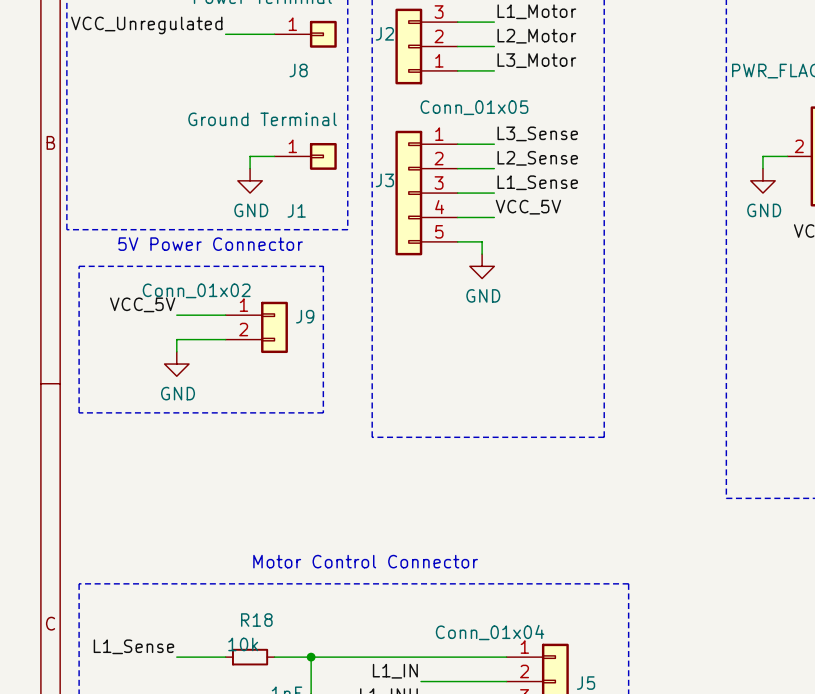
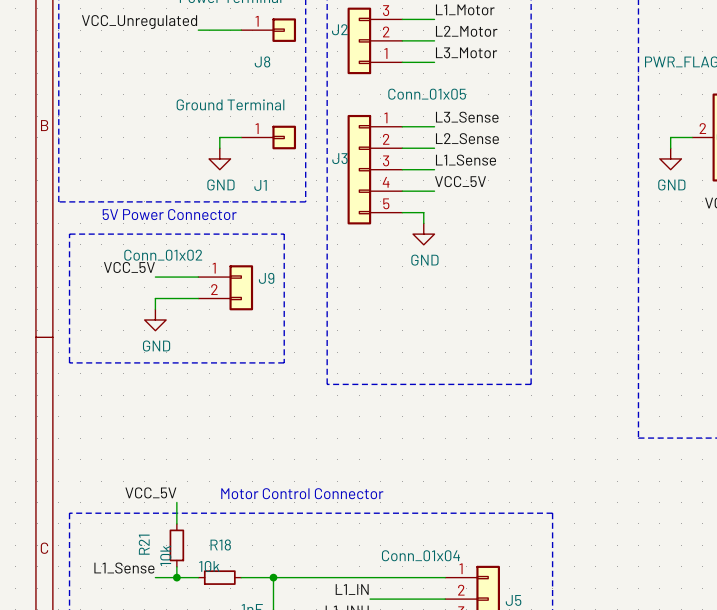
label: none -> VCC_5V (150, 492)
wire: none -> (176, 502) (176, 523)
R21: none -> 10k (176, 545)
wire: none -> (176, 566) (176, 577)
junction: none -> (176, 577)

